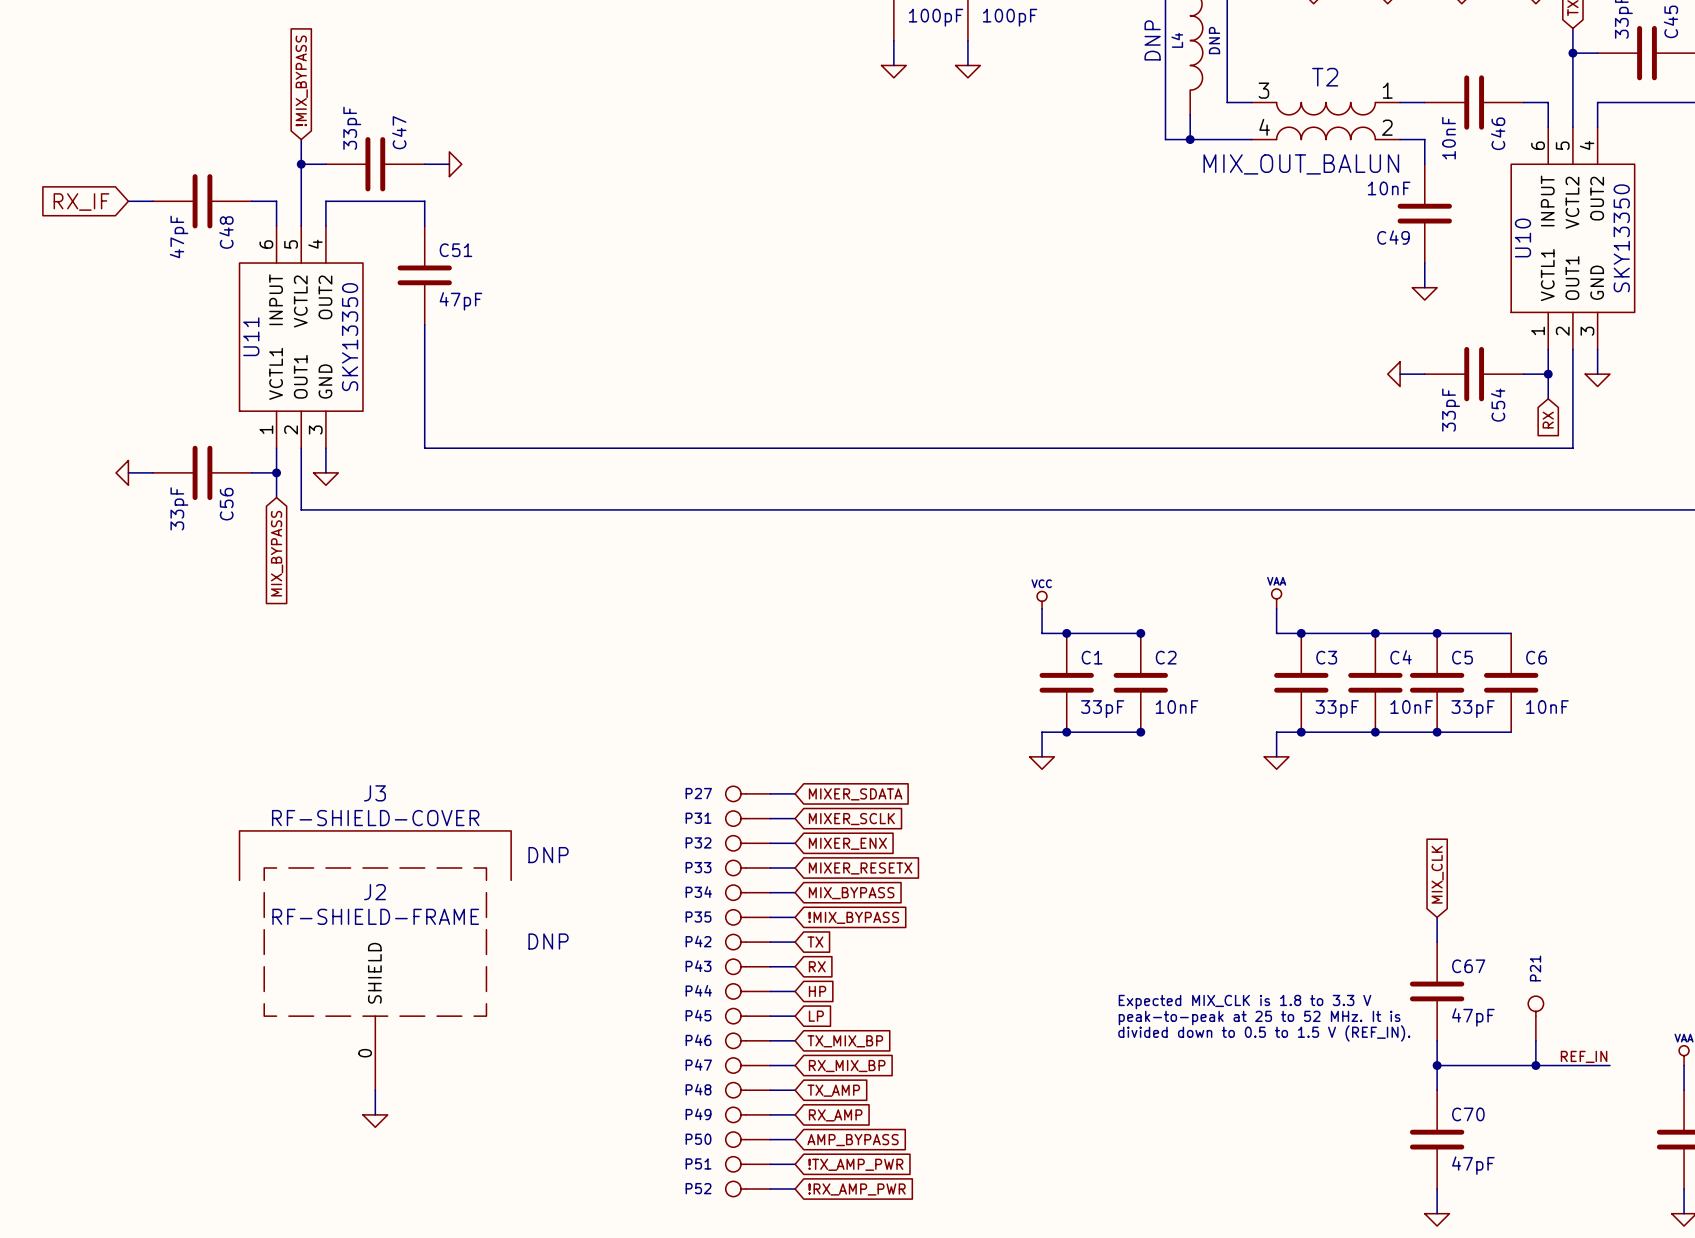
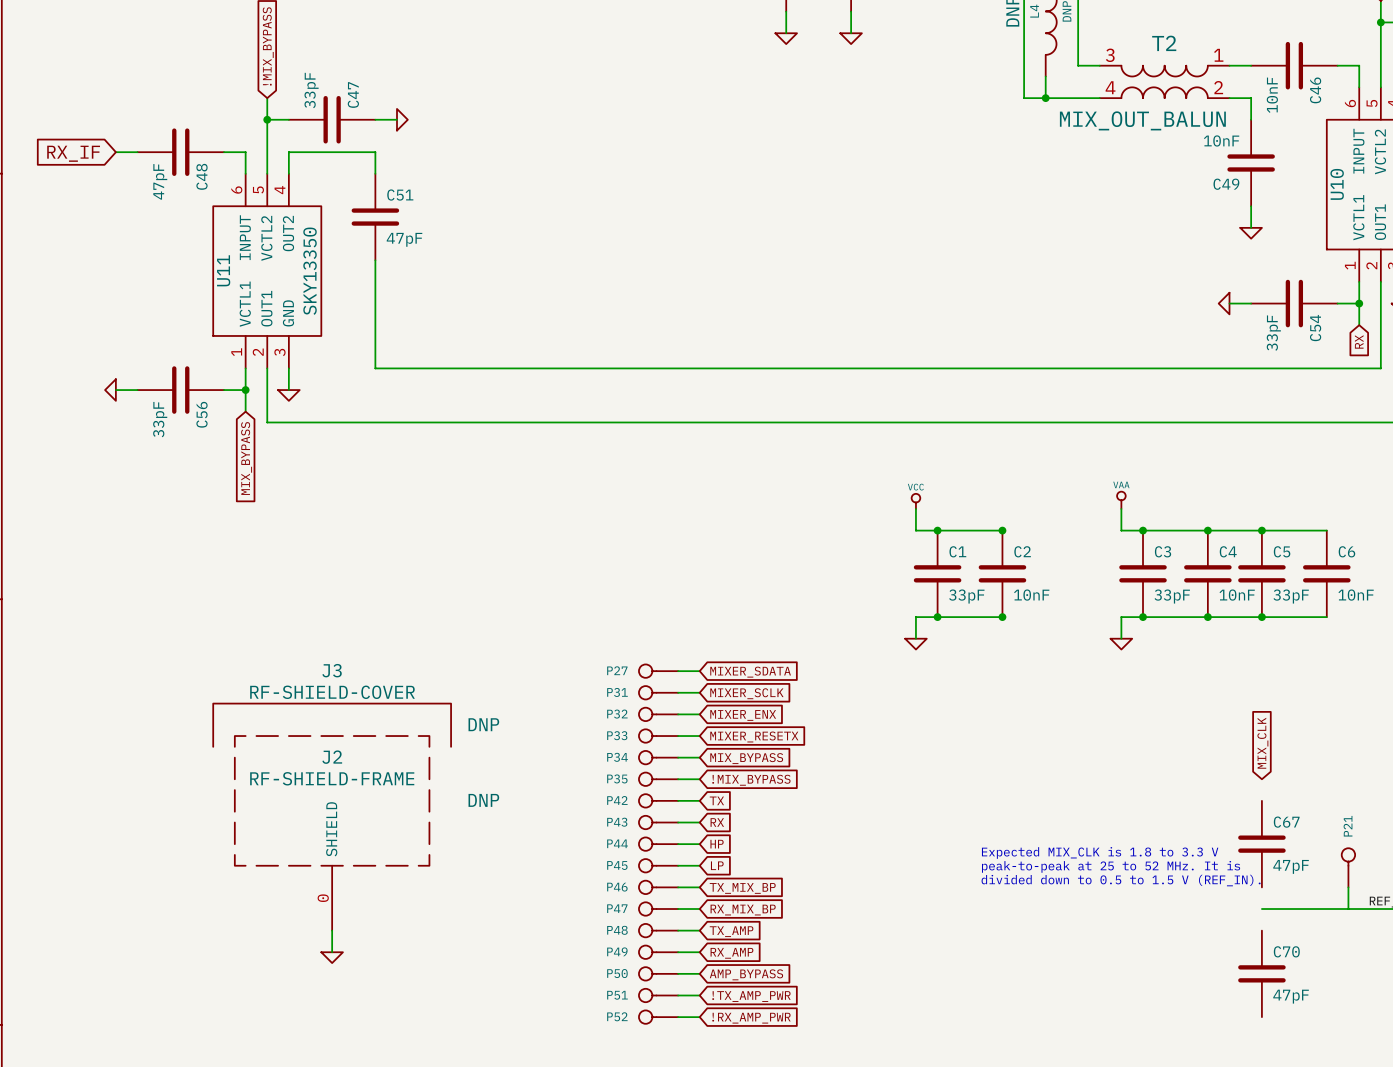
wire: (1437, 917) (1437, 942) -> none
wire: (1437, 1040) (1437, 1090) -> none
junction: (1437, 1065) -> none
junction: (1535, 1065) -> none
wire: (1437, 1189) (1437, 1213) -> none
power symbol: (1437, 1219) -> none

